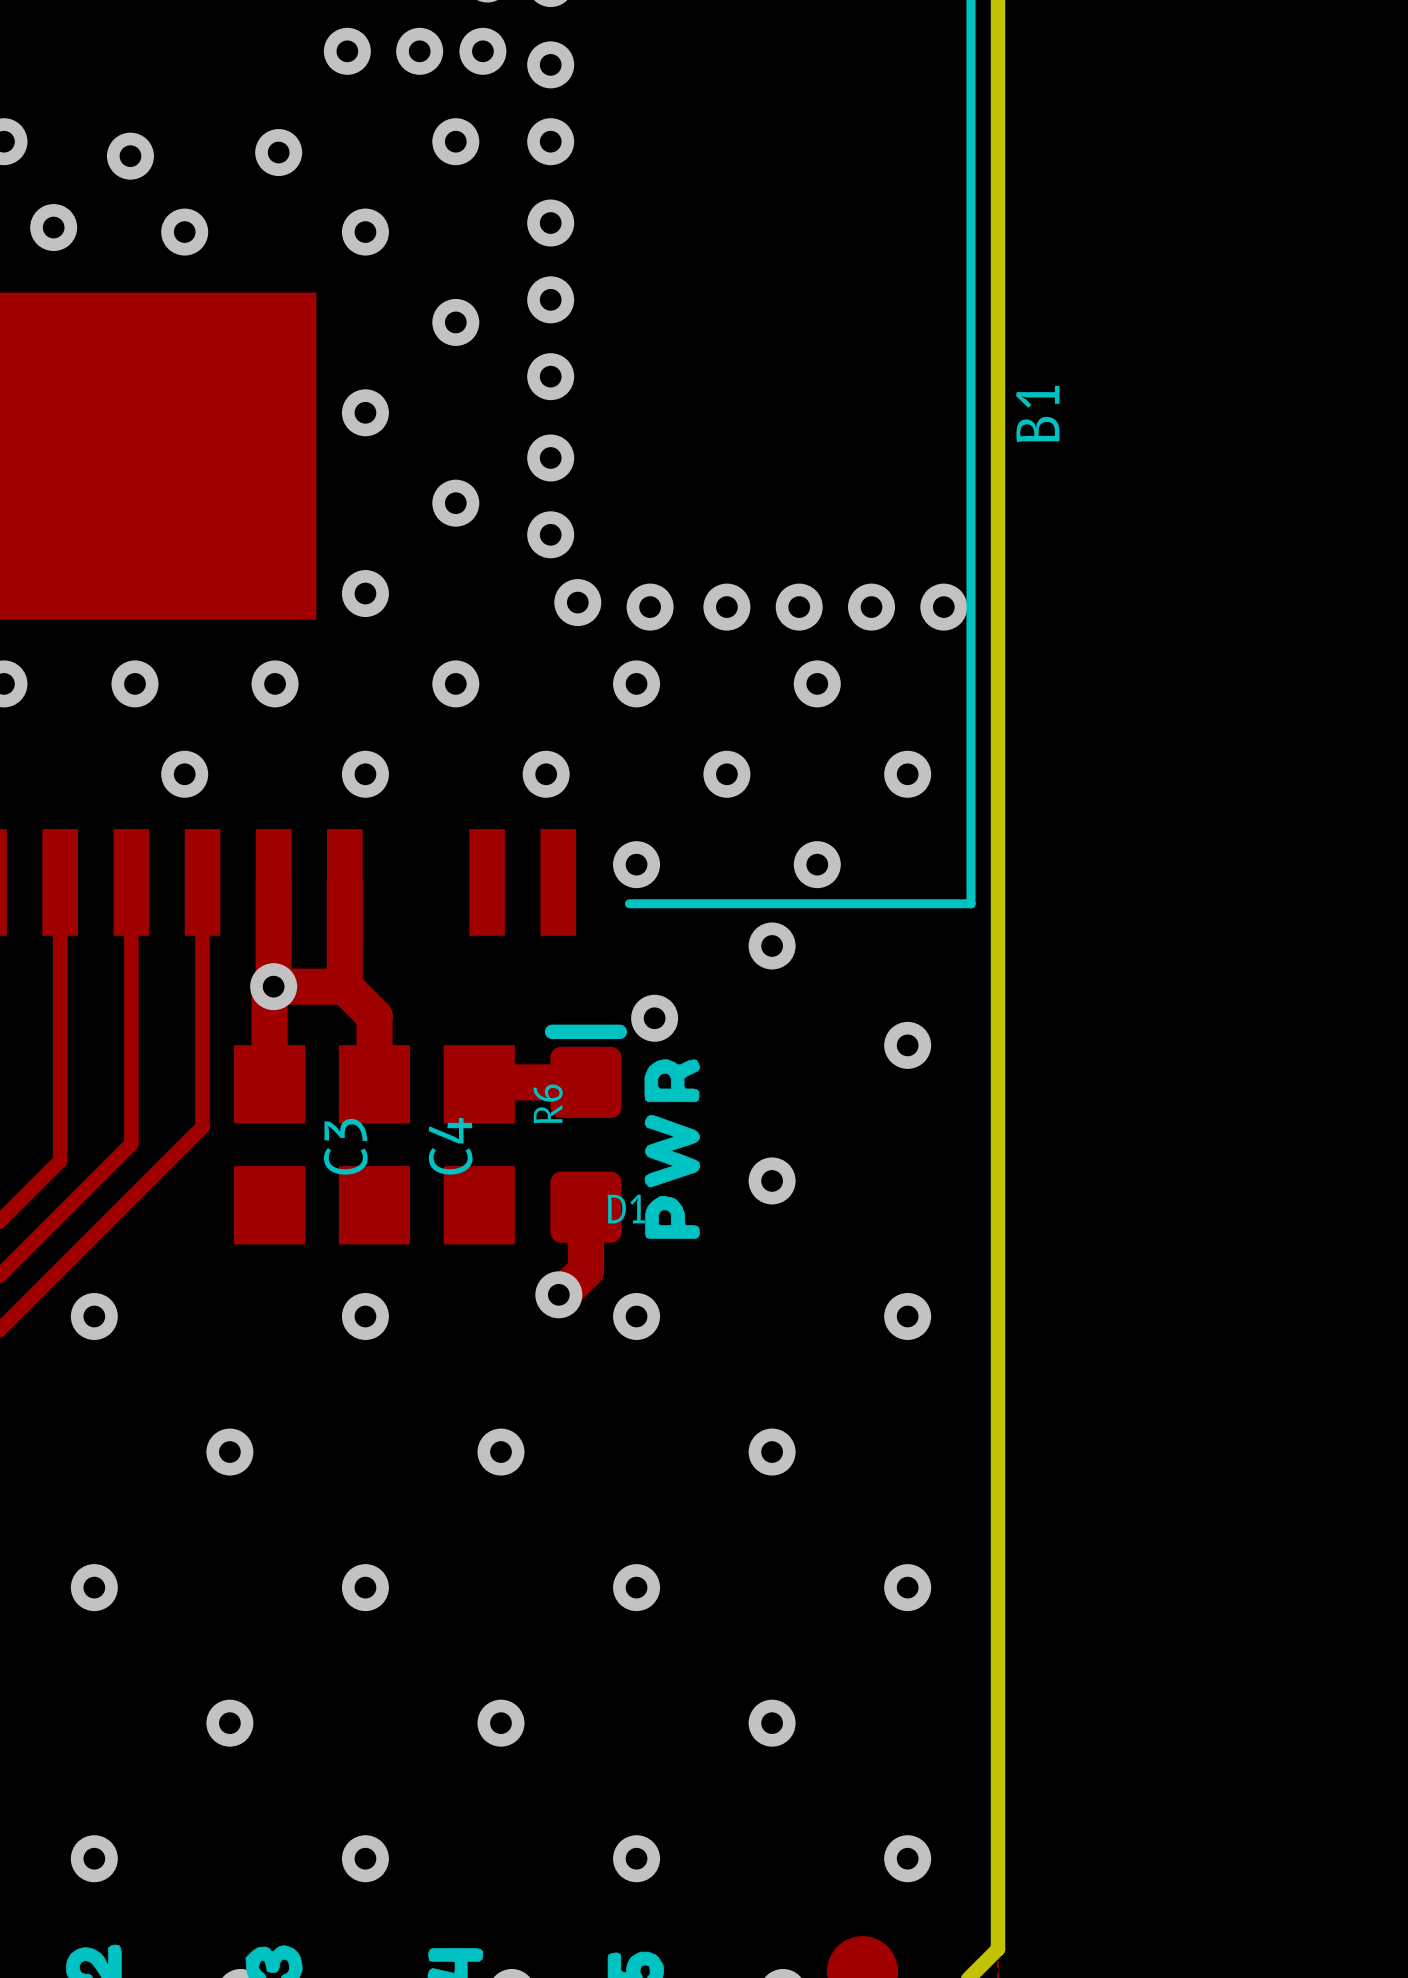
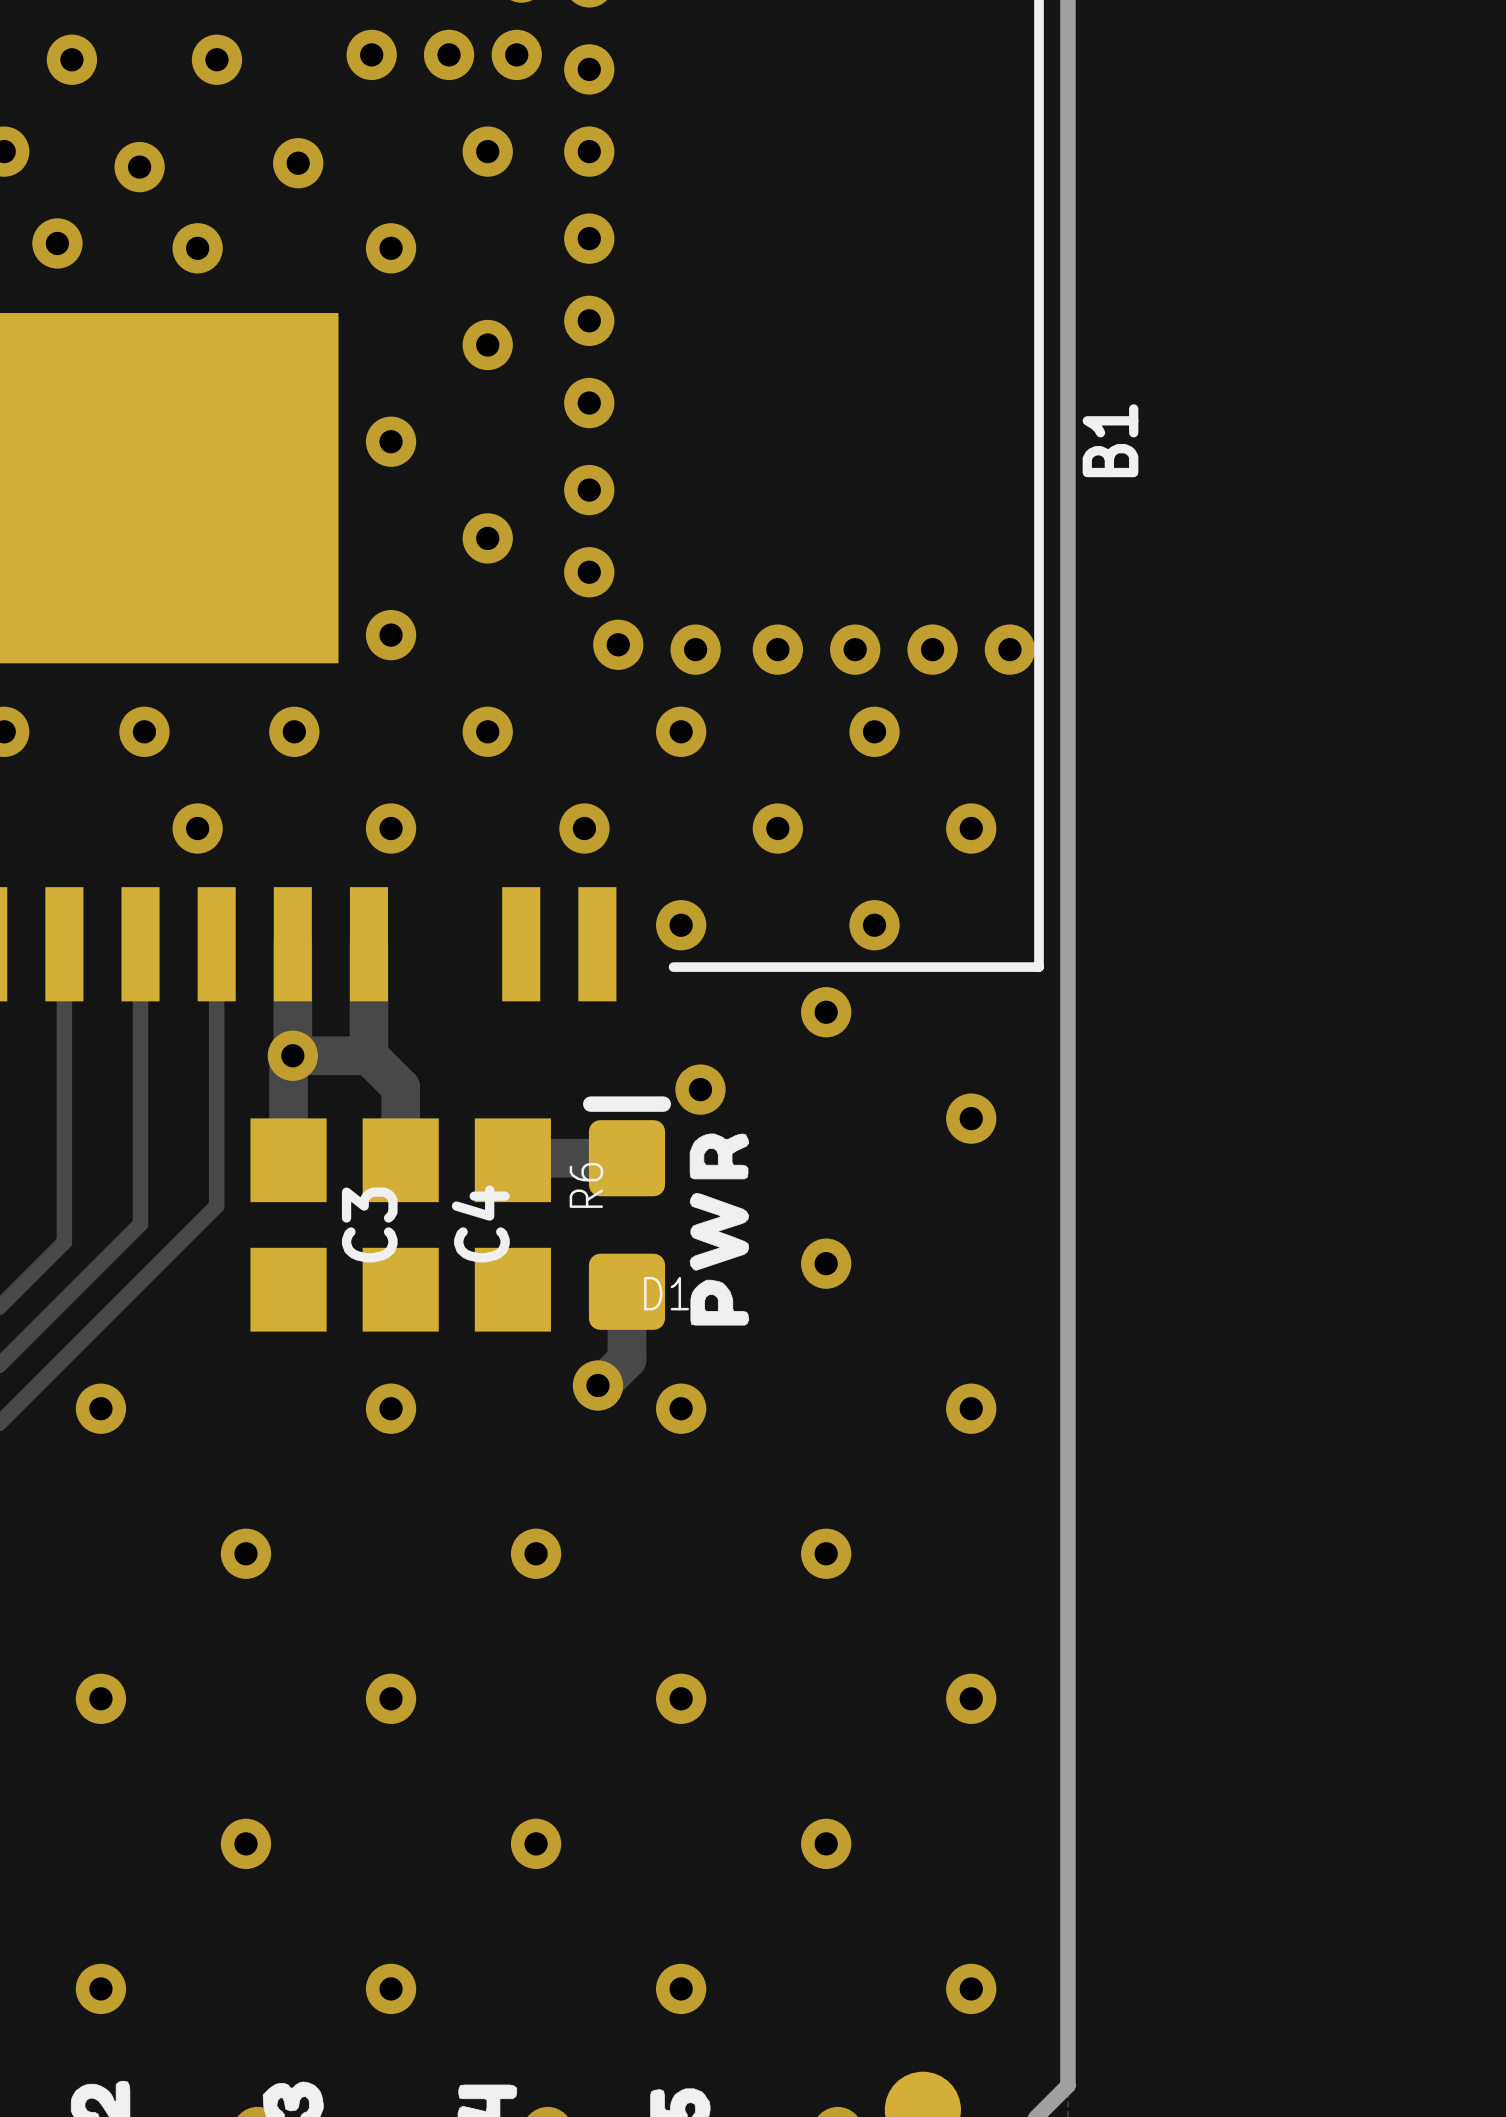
via: none -> (71, 59)
via: none -> (216, 59)

